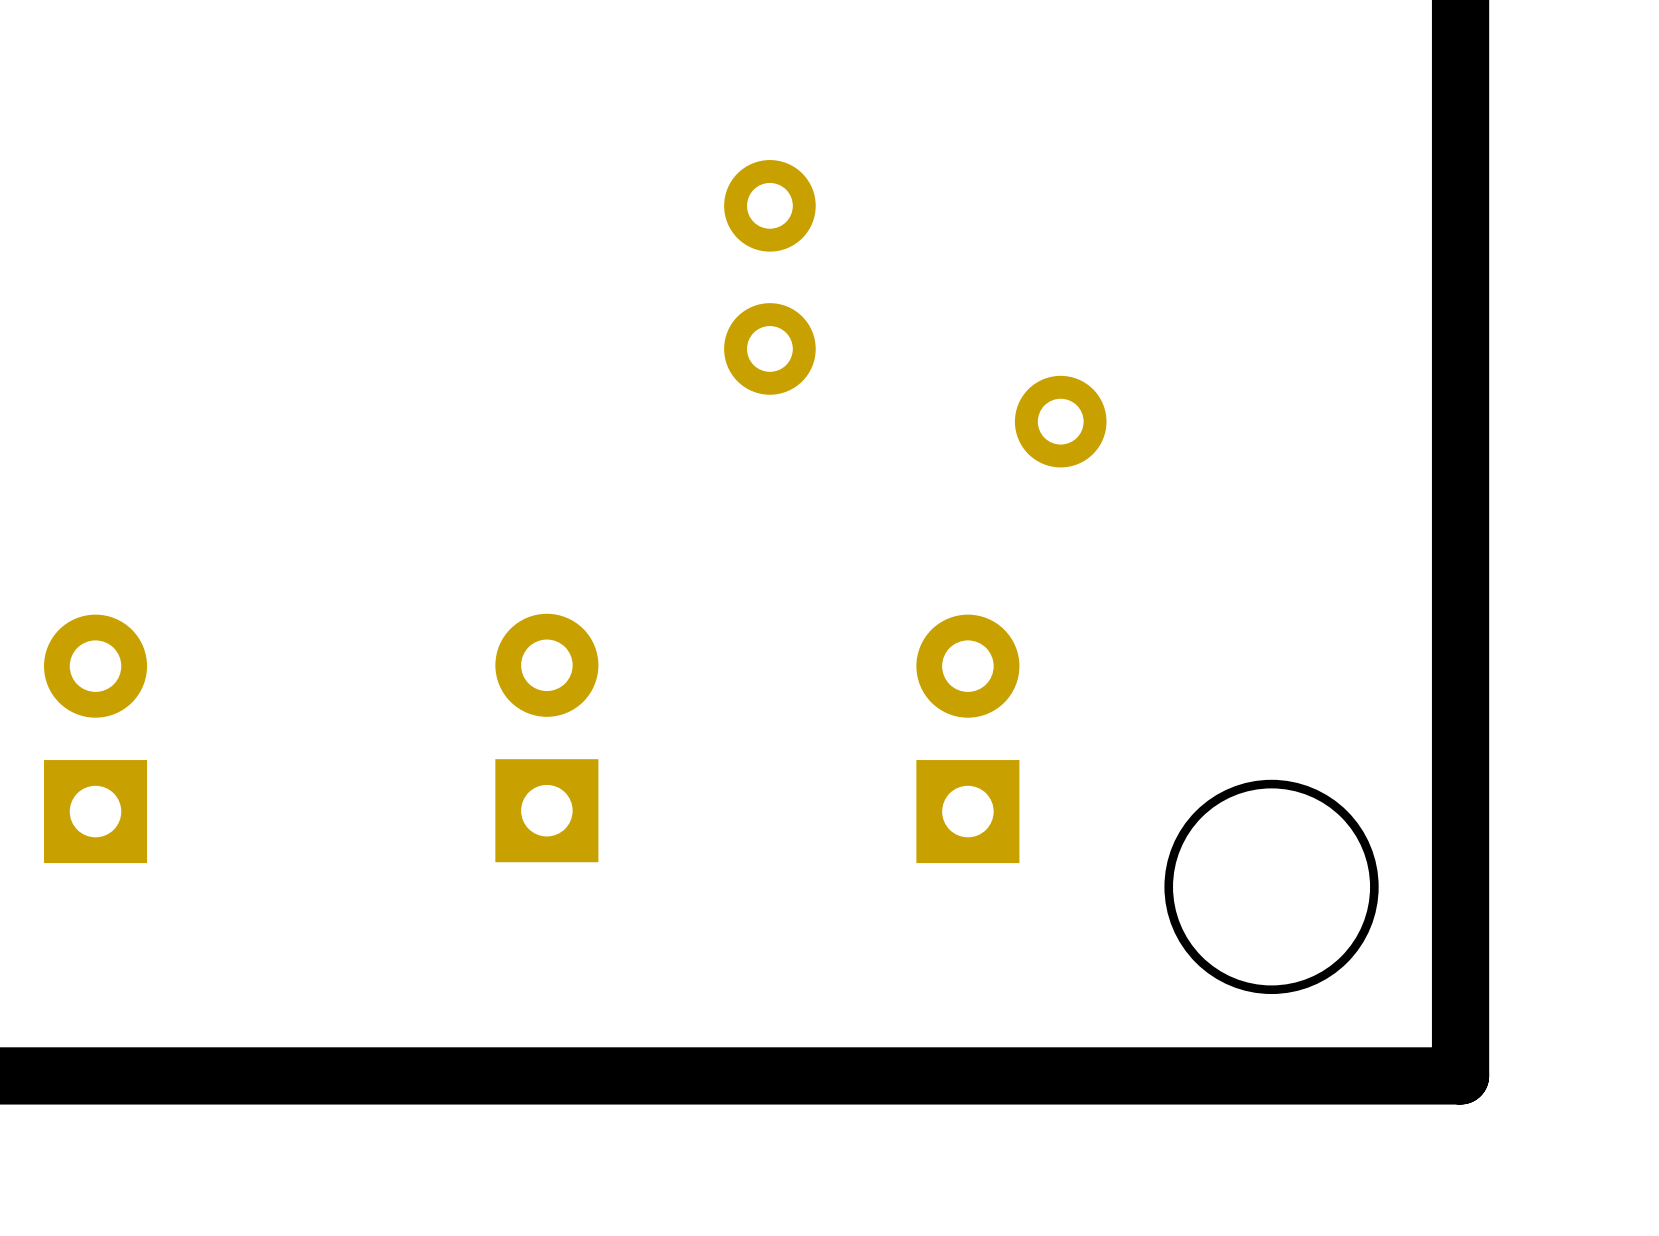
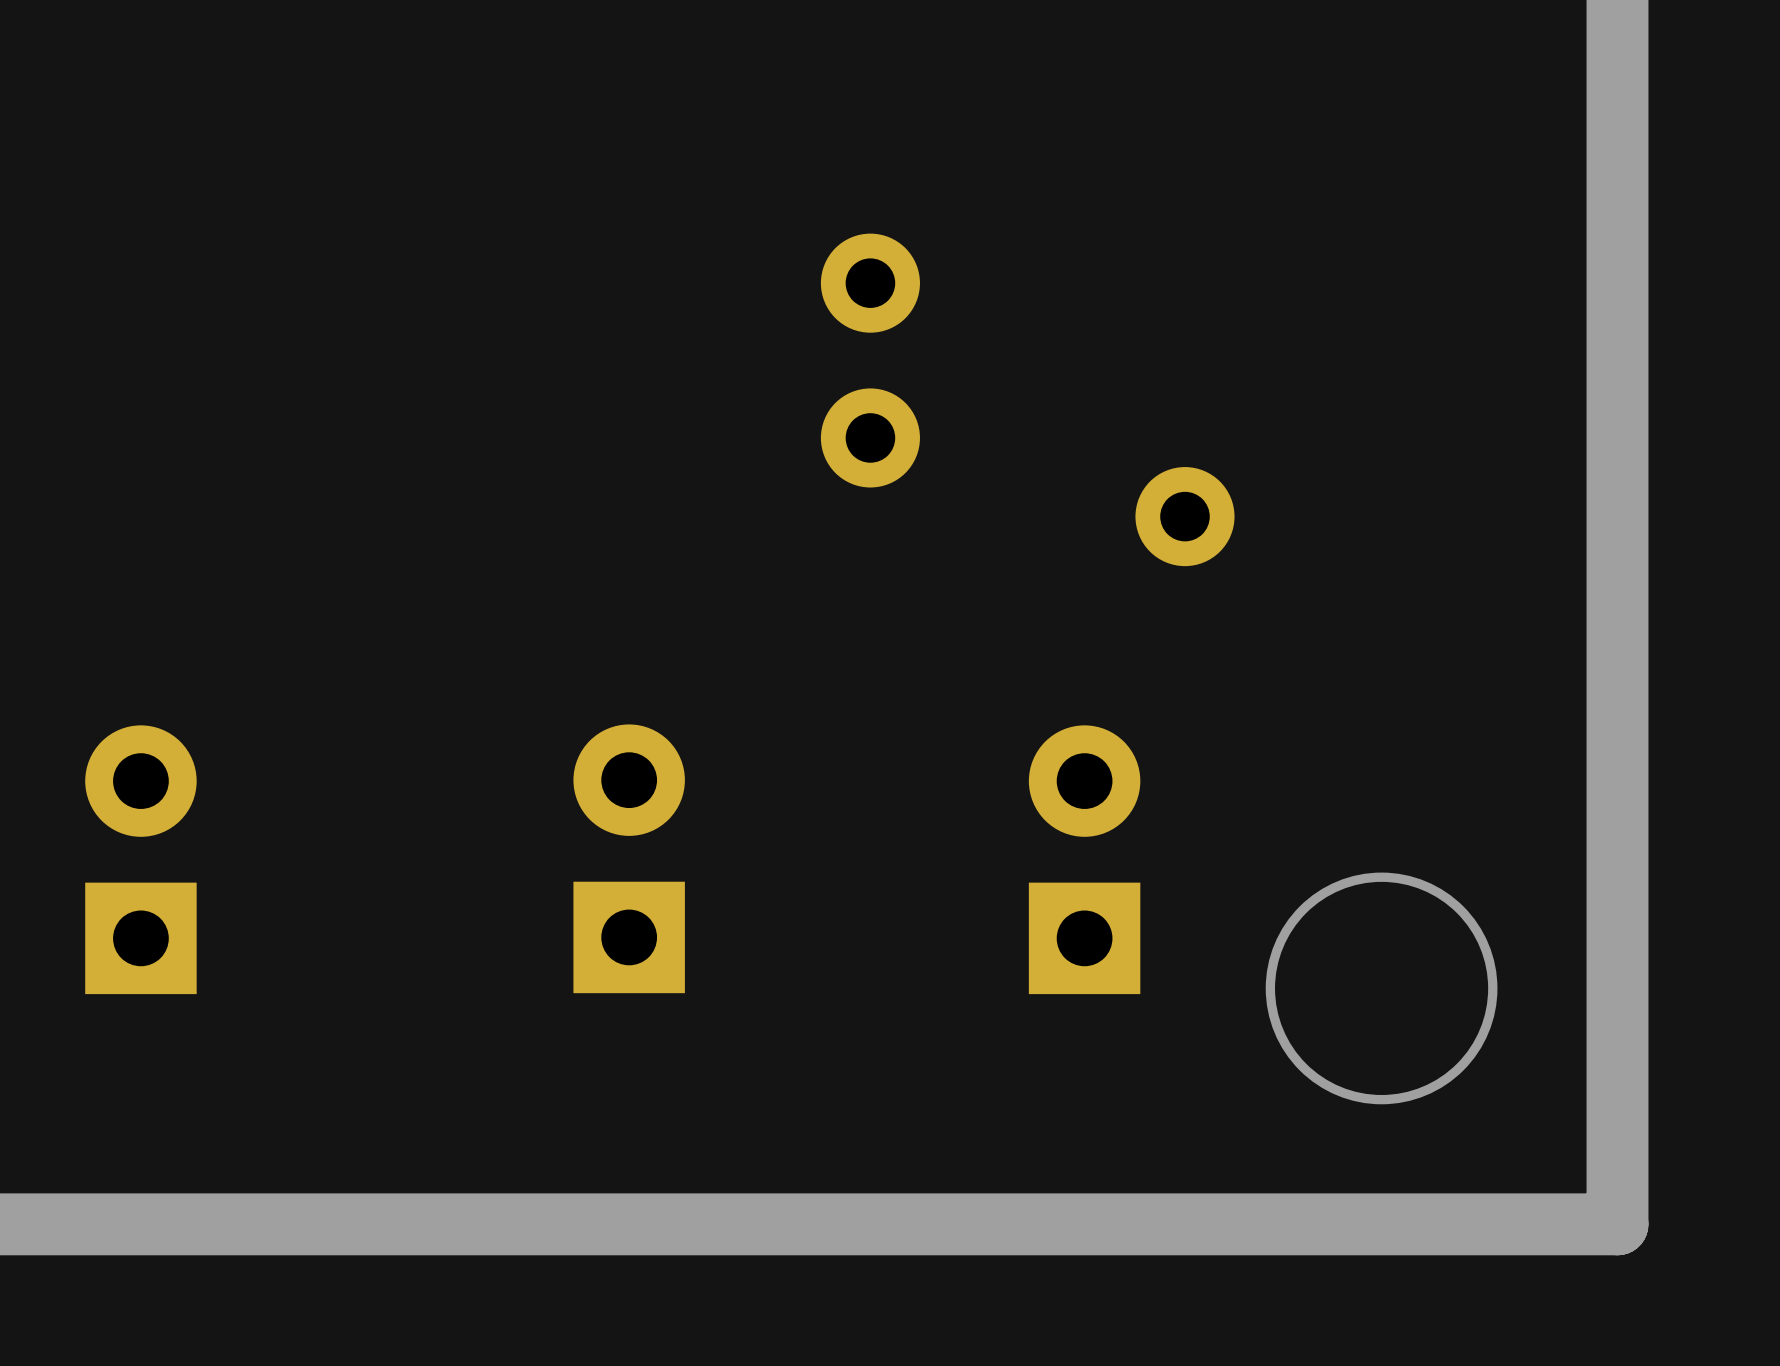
round board edge position: (1271, 886) -> (1381, 988)

